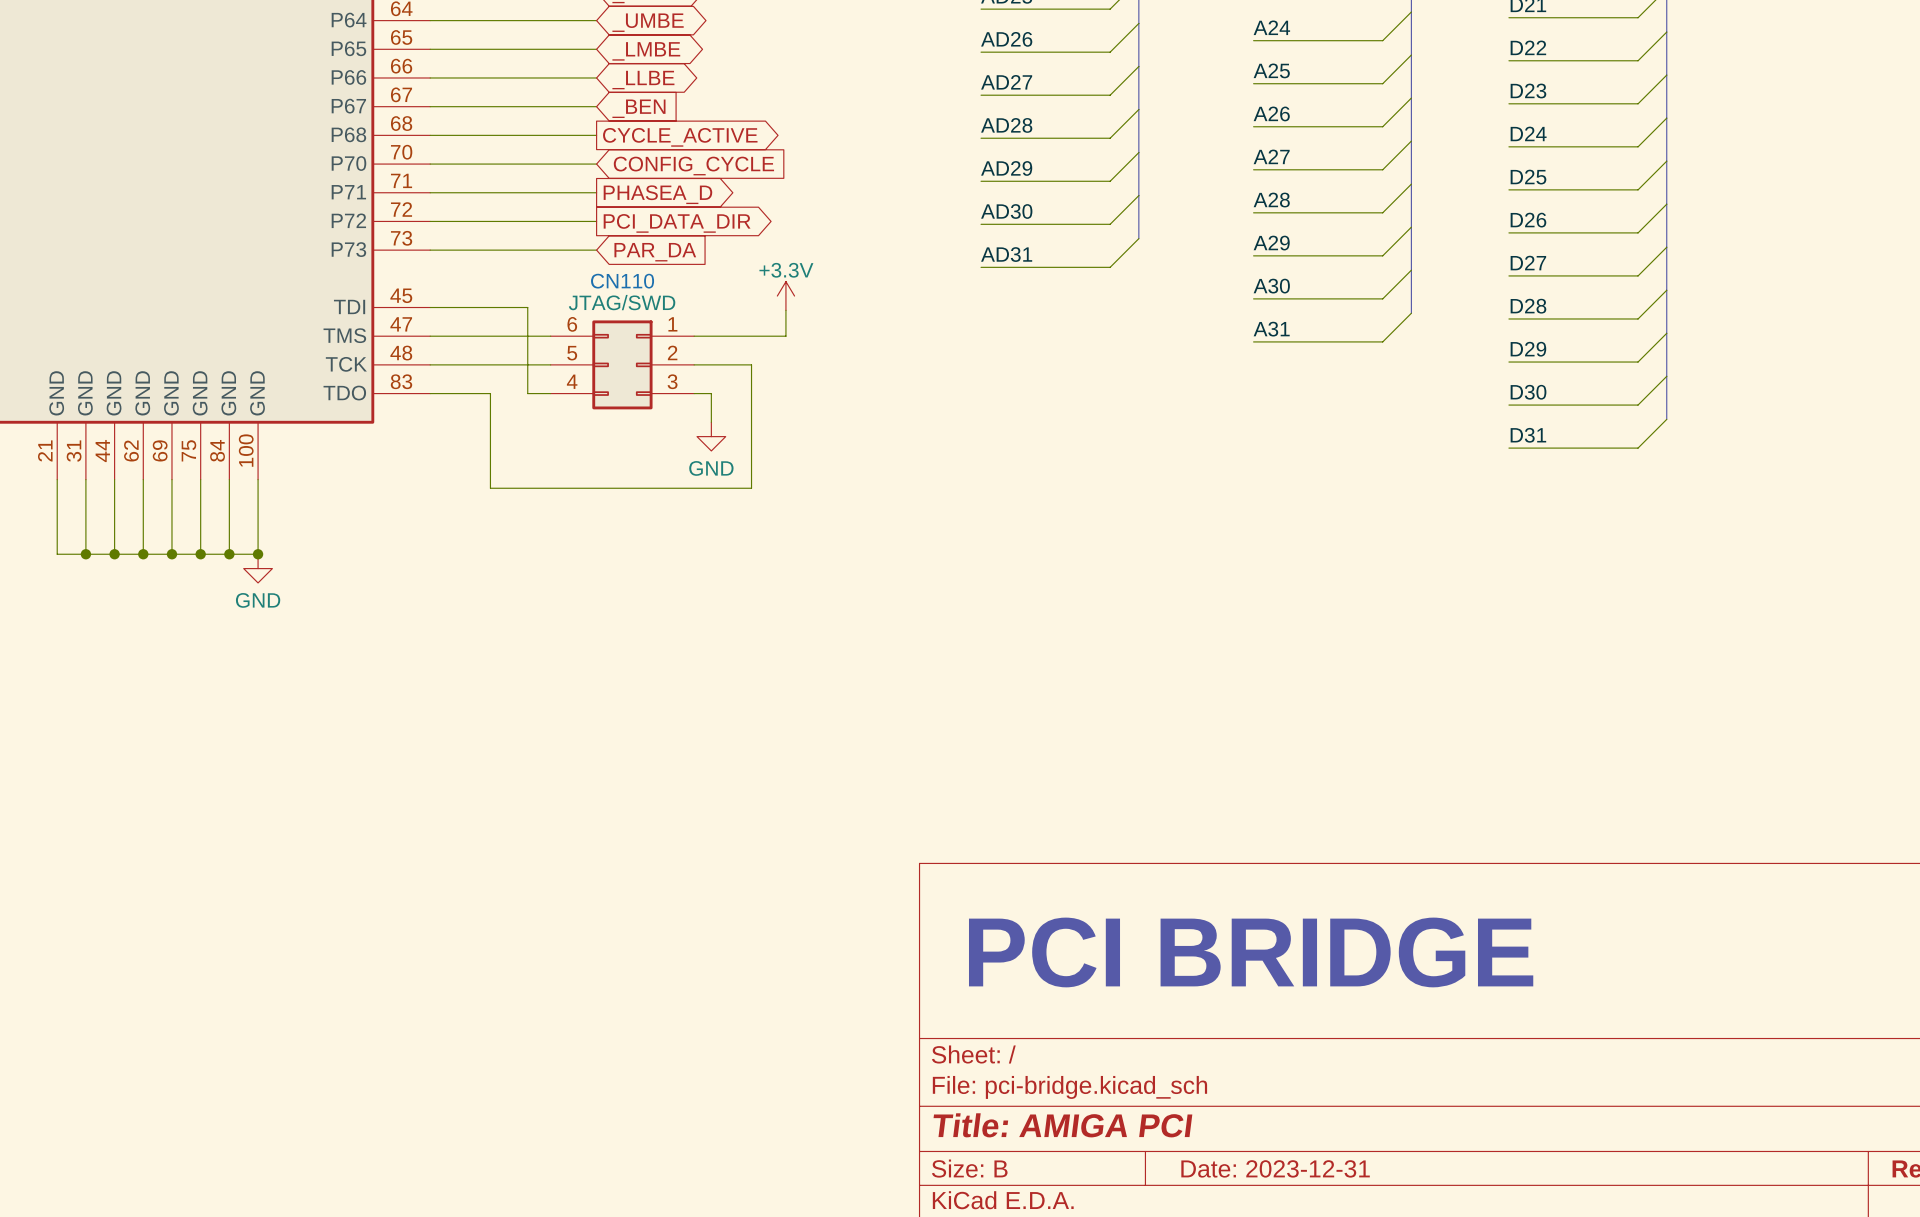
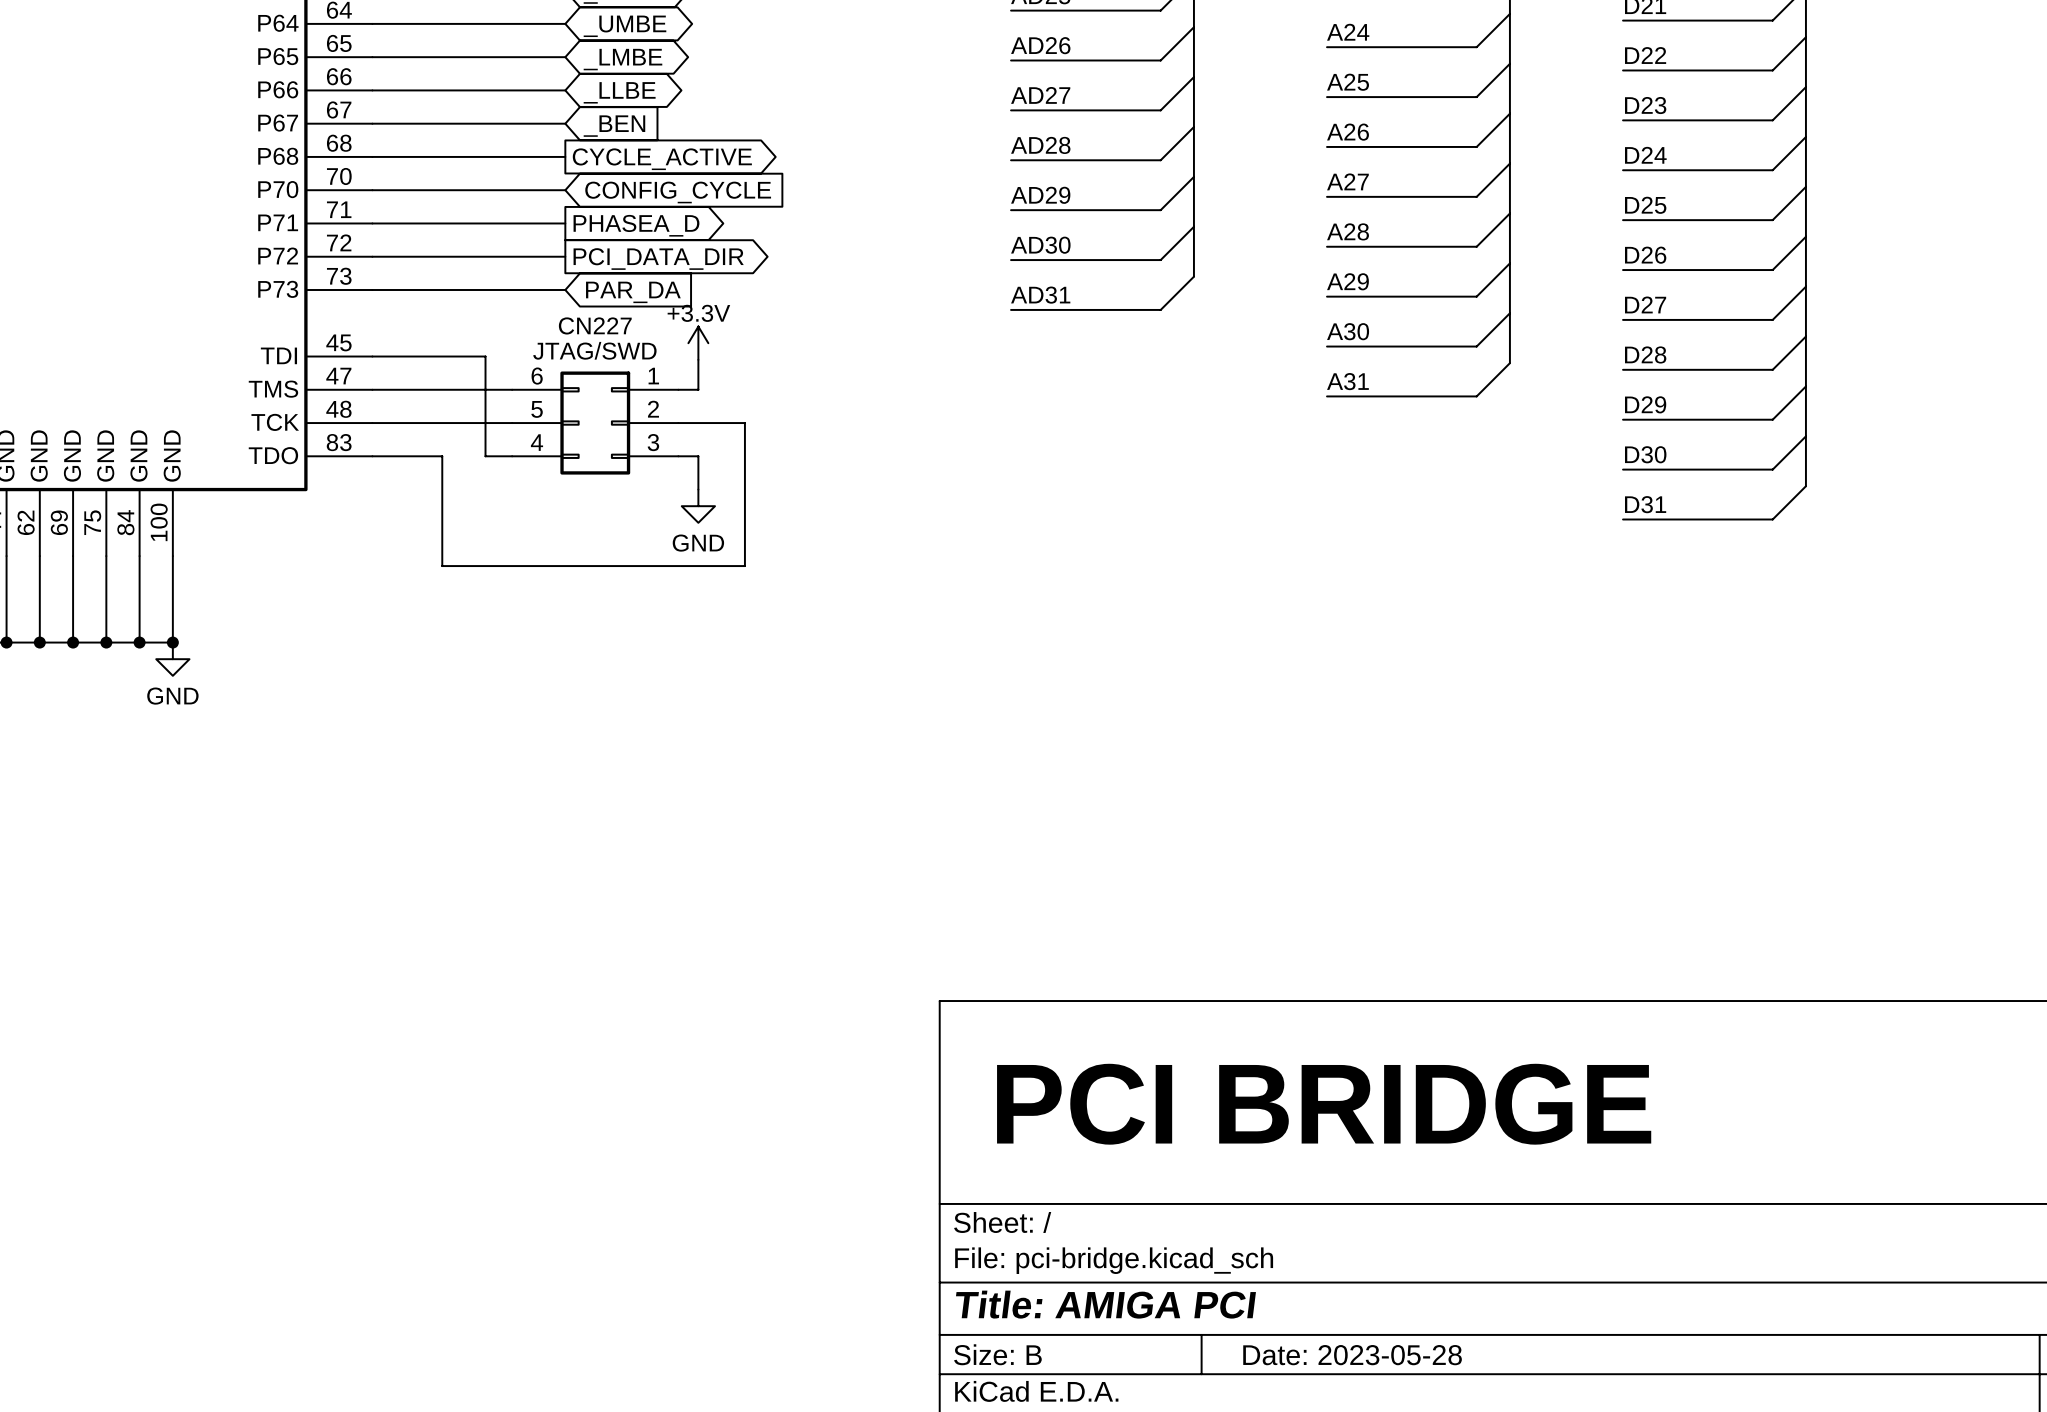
CN110 name: CN110 (622, 281) -> CN227 (595, 325)
power symbol position: +3.3V (785, 296) -> +3.3V (698, 343)
wire: (785, 310) (785, 336) (711, 336) -> (698, 359) (698, 389)
title block: Date: 2023-12-31 (1275, 1168) -> Date: 2023-05-28 (1352, 1355)

